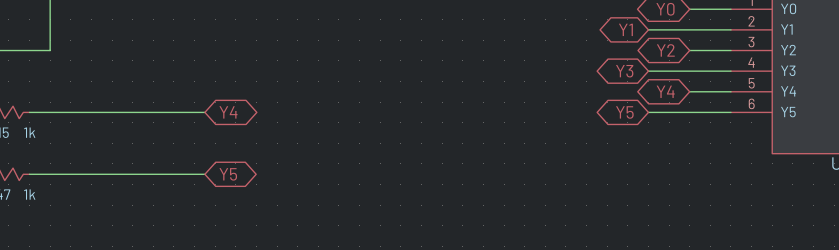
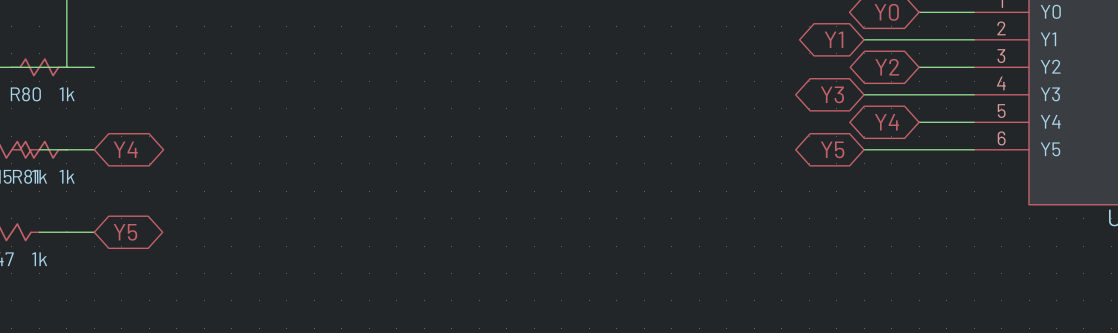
R80: none -> 1k (39, 67)
wire: none -> (66, 67) (94, 67)
R81: none -> 1k (39, 149)
wire: (70, 112) (204, 112) -> none
global label position: Y4 (228, 112) -> Y4 (125, 149)
wire: (70, 174) (204, 174) -> none
global label position: Y5 (228, 174) -> Y5 (125, 232)

